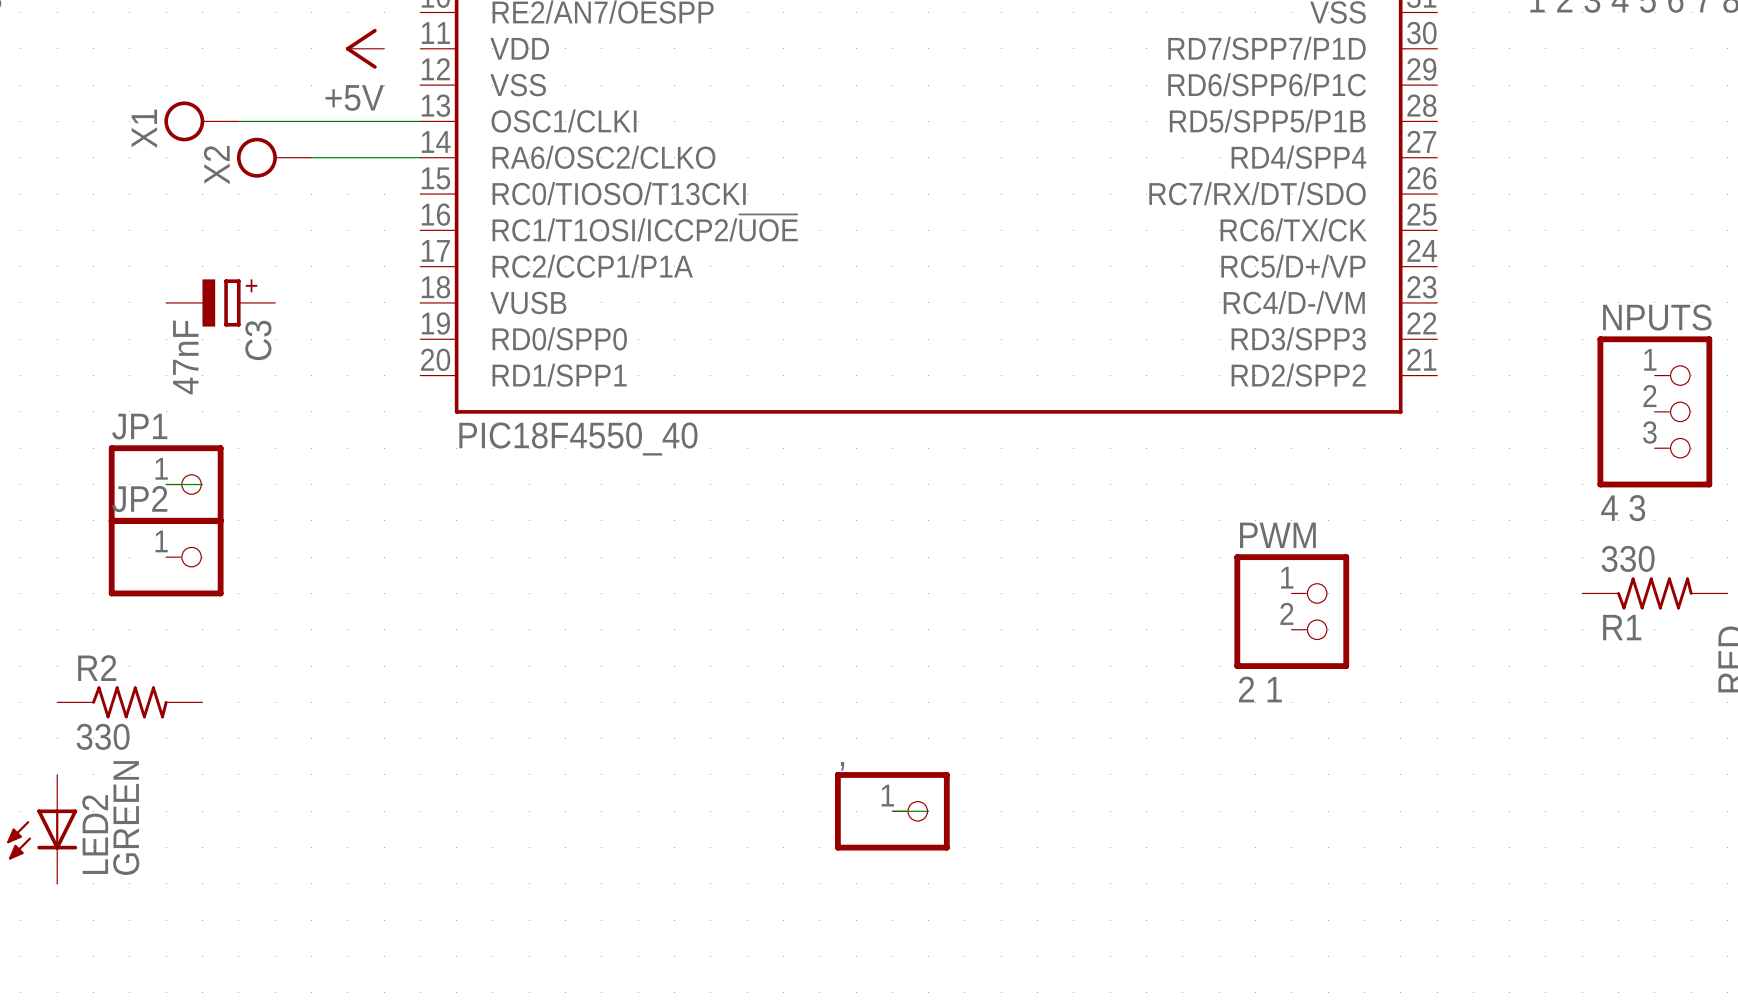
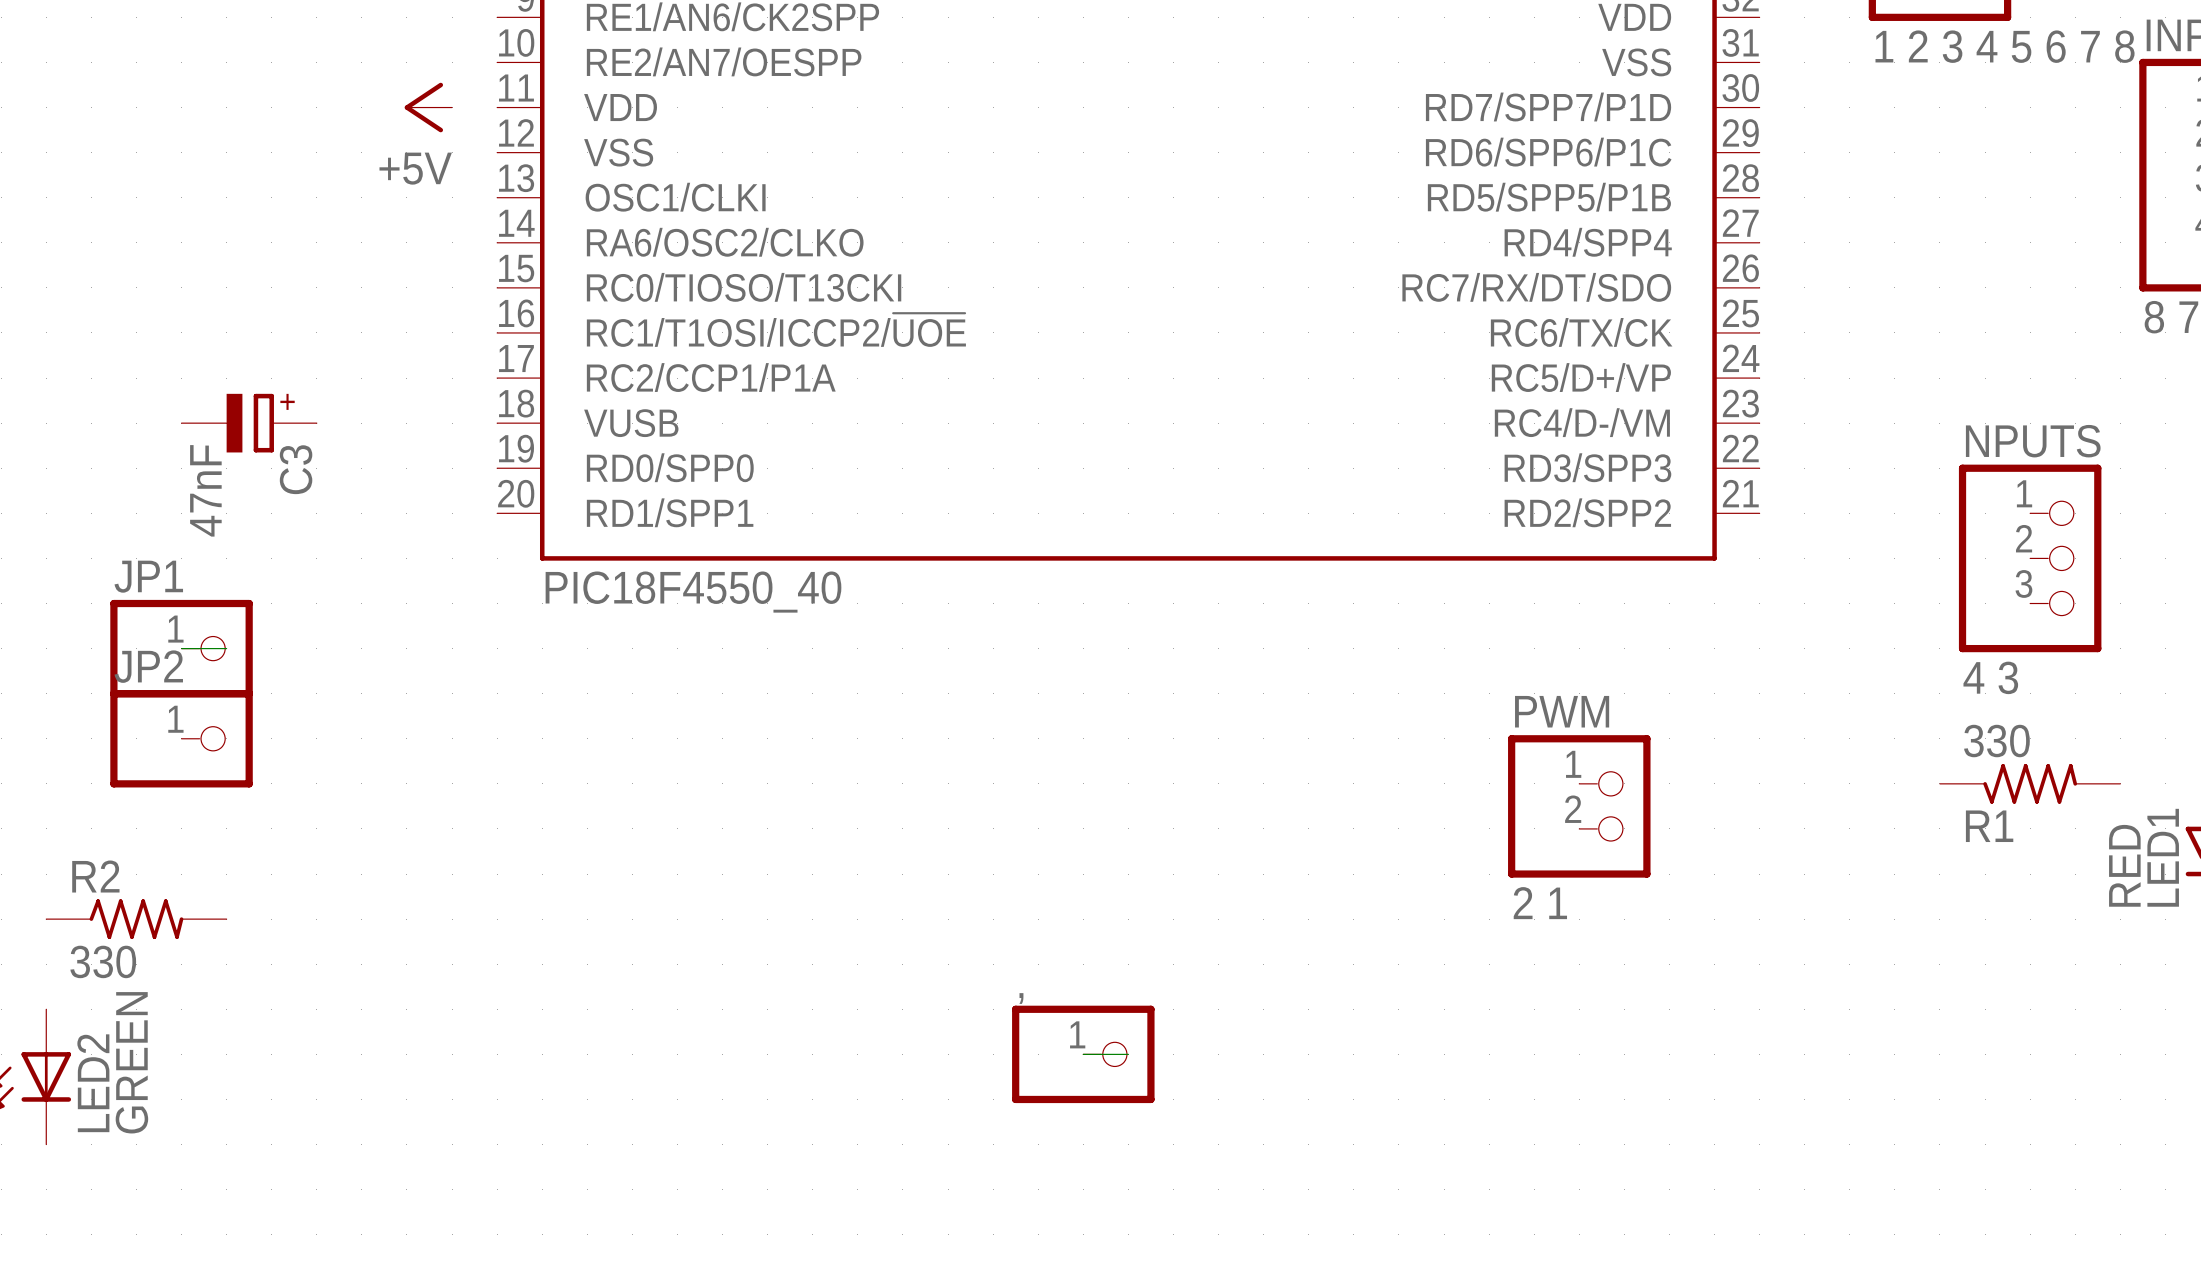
power symbol: X1 (201, 121) -> none
wire: (238, 121) (420, 121) -> none
power symbol: X2 (274, 157) -> none
wire: (311, 157) (420, 157) -> none

